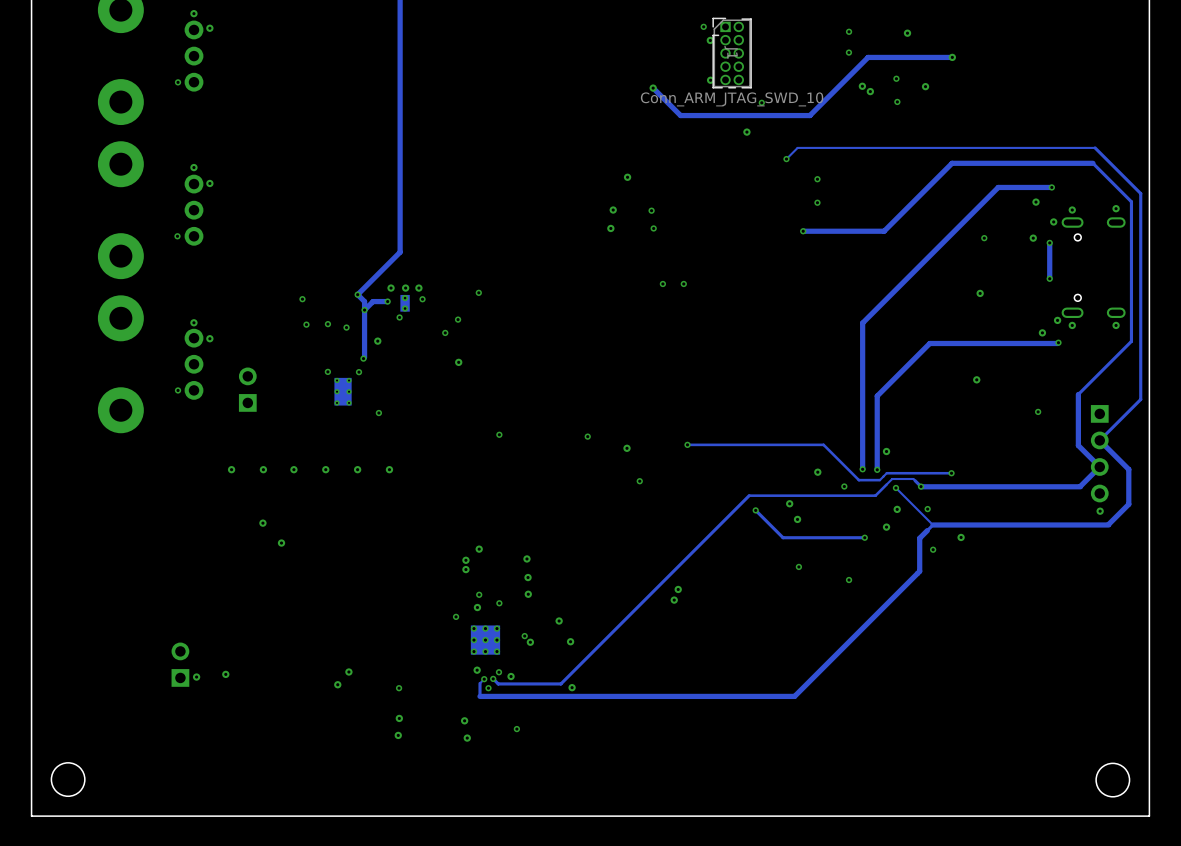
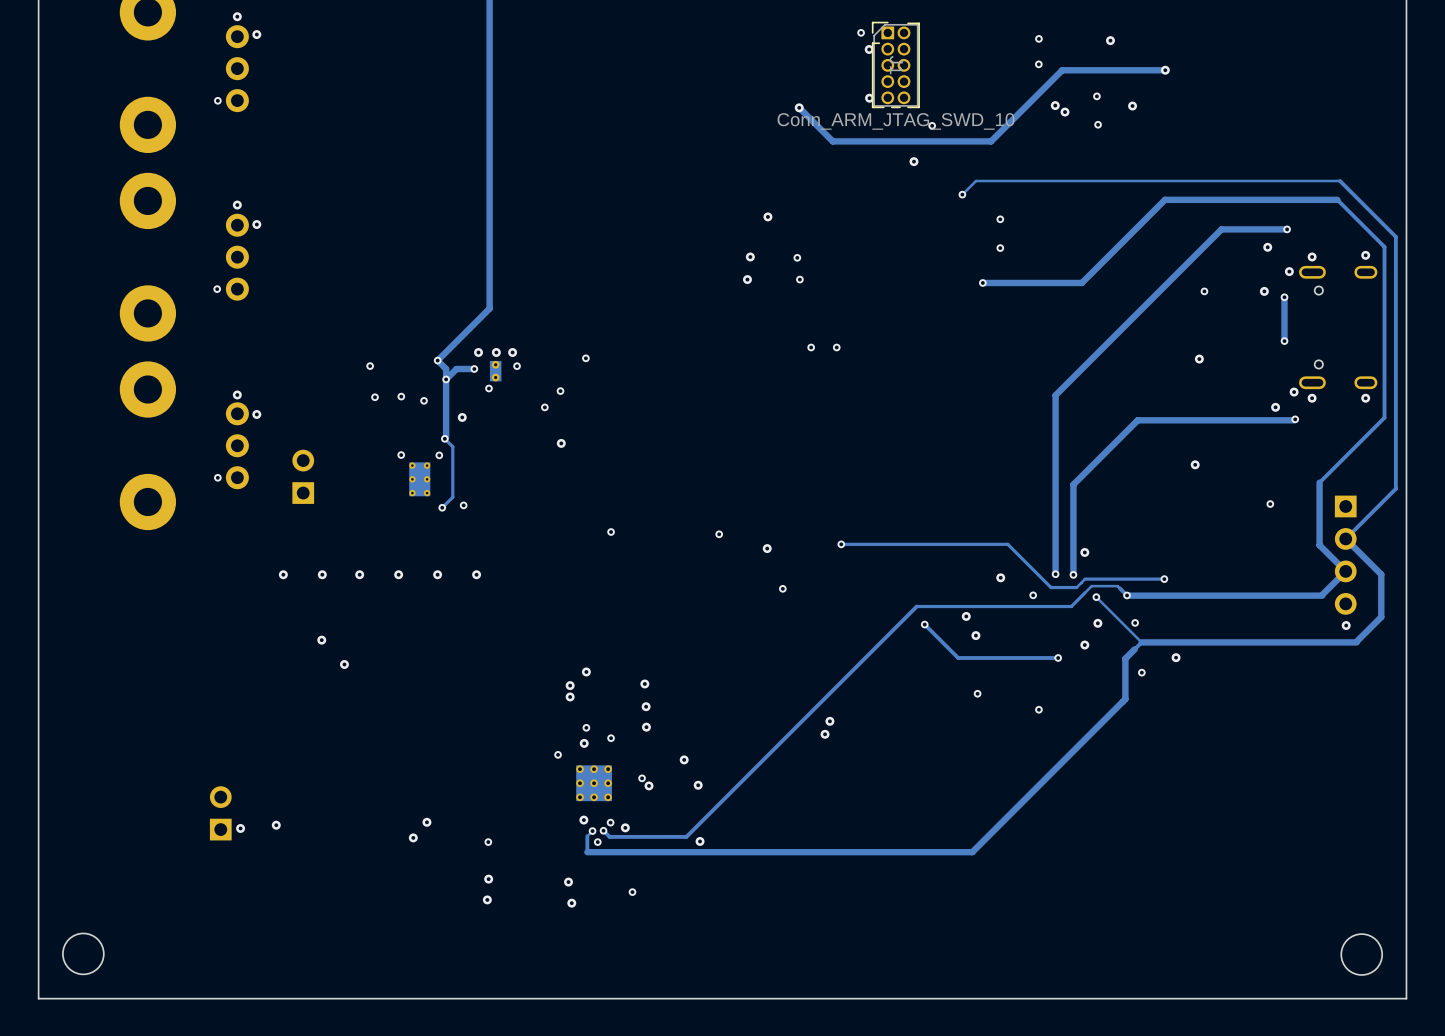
track: none -> (444, 438) (452, 446) (452, 497) (442, 507)
via: none -> (442, 507)

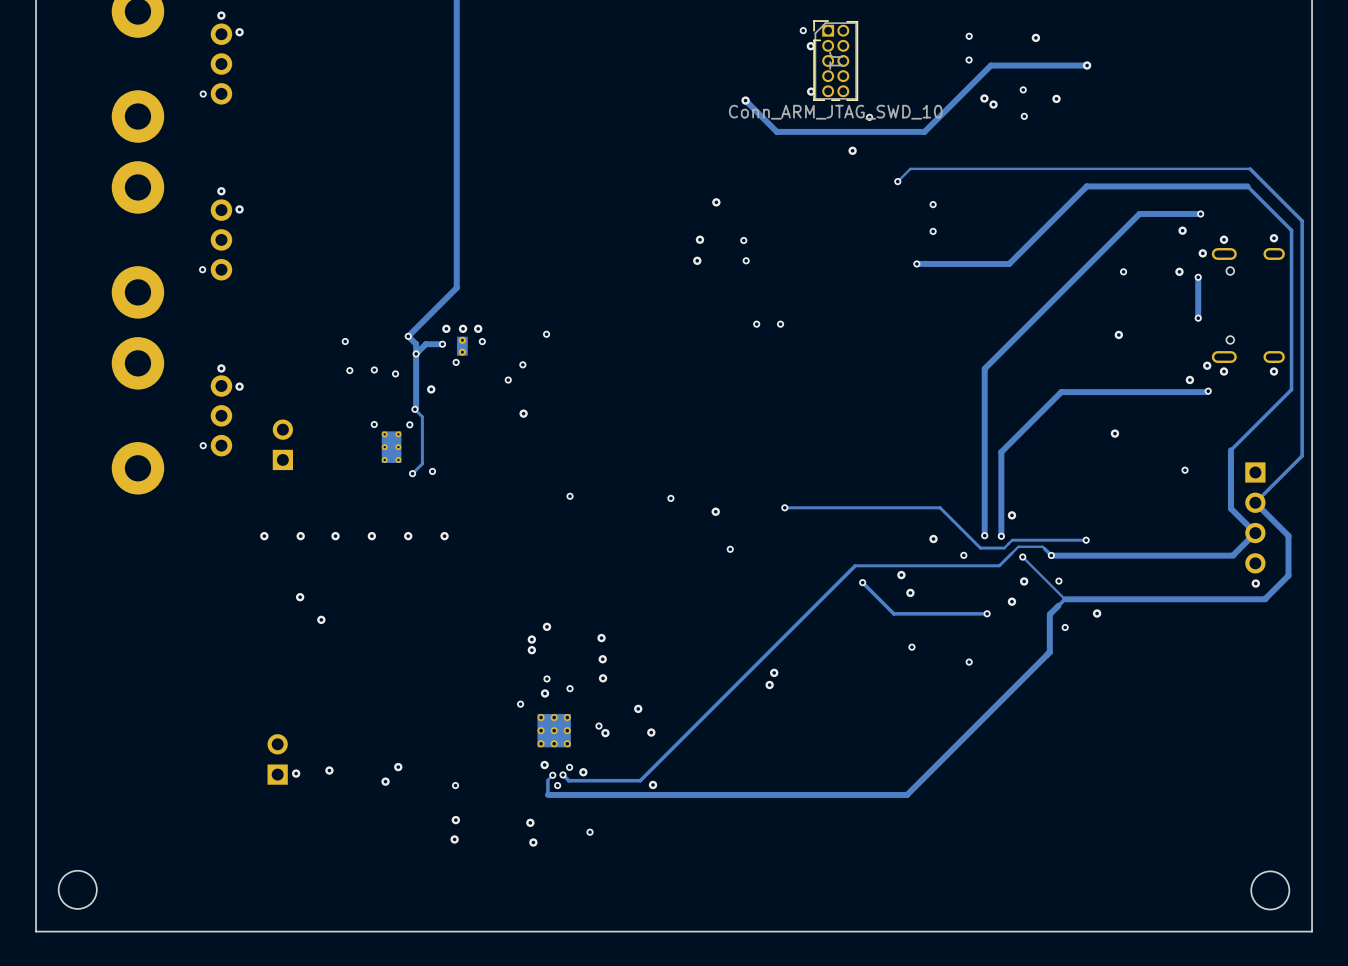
part position: (220, 813) -> (277, 759)
via: (276, 825) -> none
via: none -> (329, 770)
via: (240, 828) -> none
via: none -> (296, 773)

